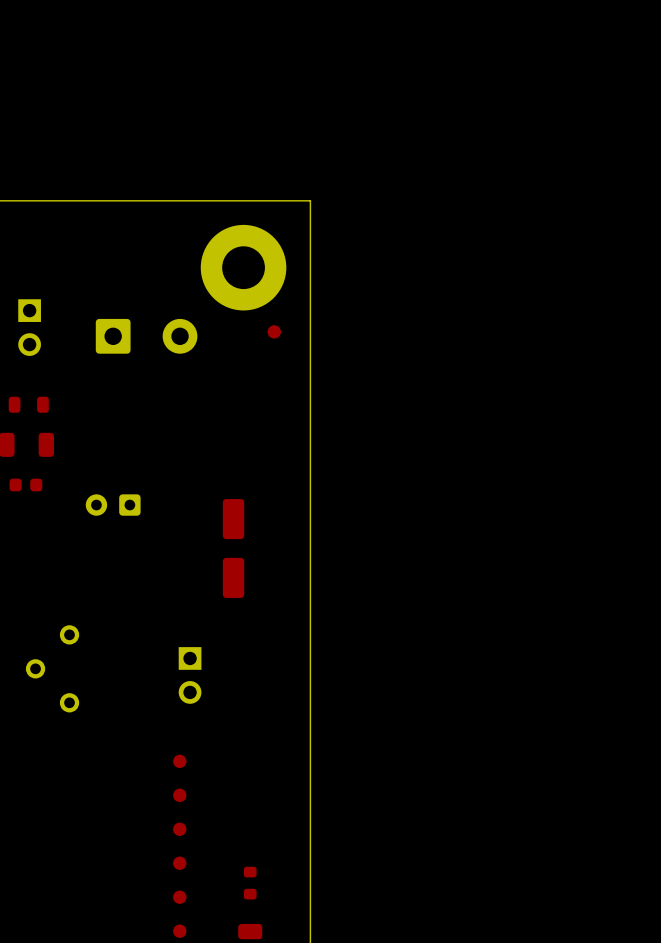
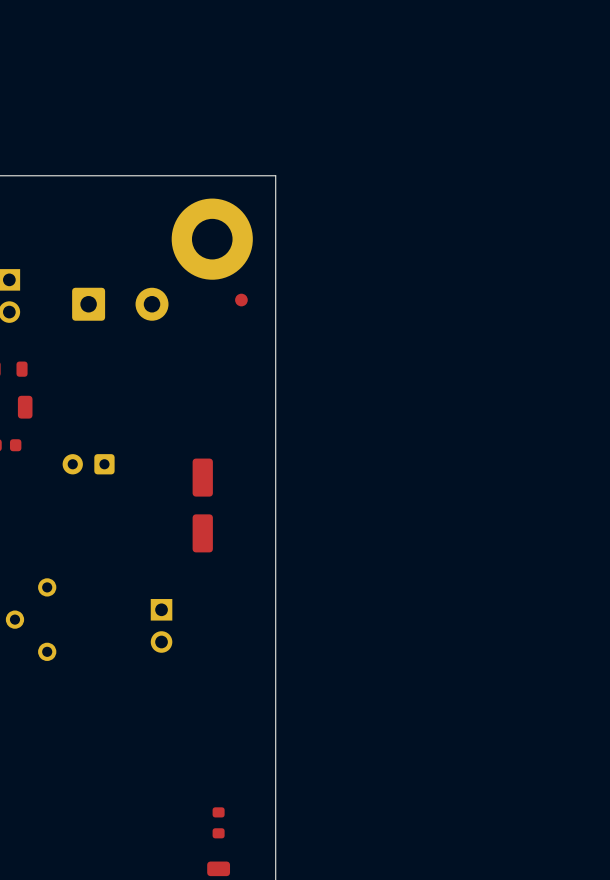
part: (179, 761) -> none
part: (179, 795) -> none
part: (179, 829) -> none
part: (179, 863) -> none
part: (179, 897) -> none
part: (179, 931) -> none

